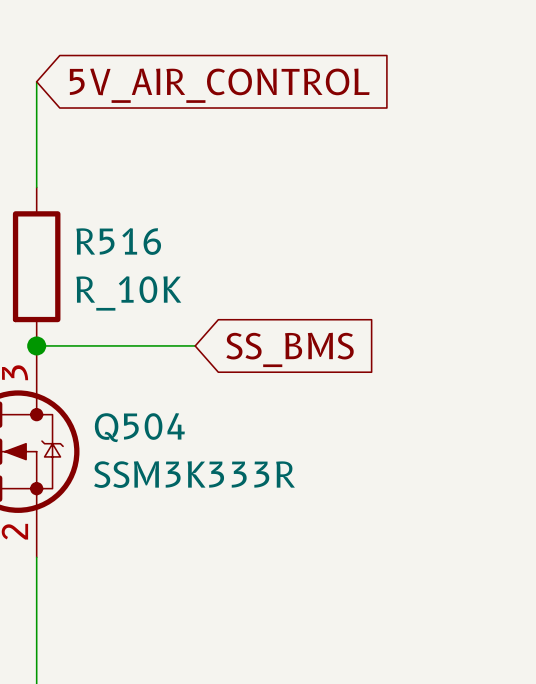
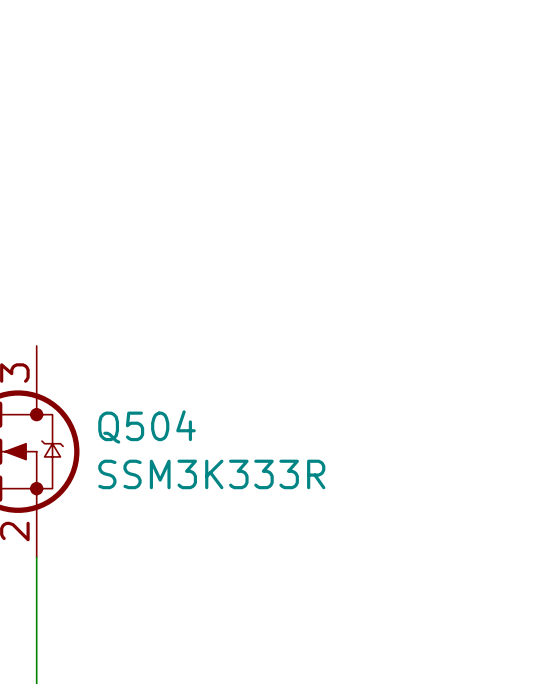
wire: (36, 81) (36, 187) -> none
global label: 5V_AIR_CONTROL (219, 85) -> none
R516: R_10K (36, 266) -> none
wire: (36, 345) (195, 345) -> none
junction: (36, 345) -> none
global label: SS_BMS (290, 349) -> none

